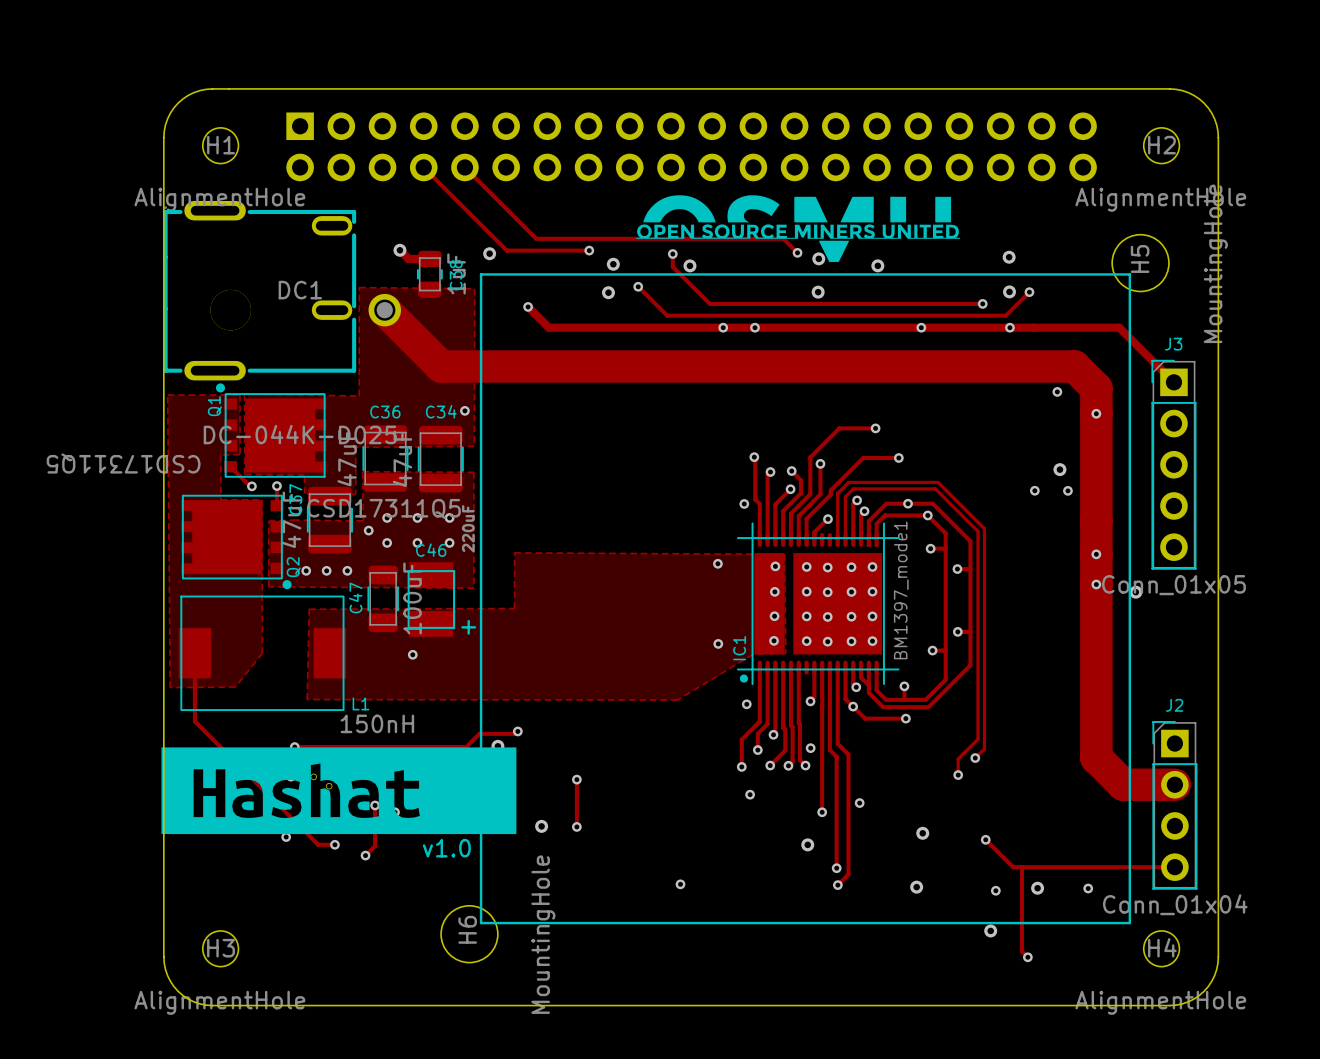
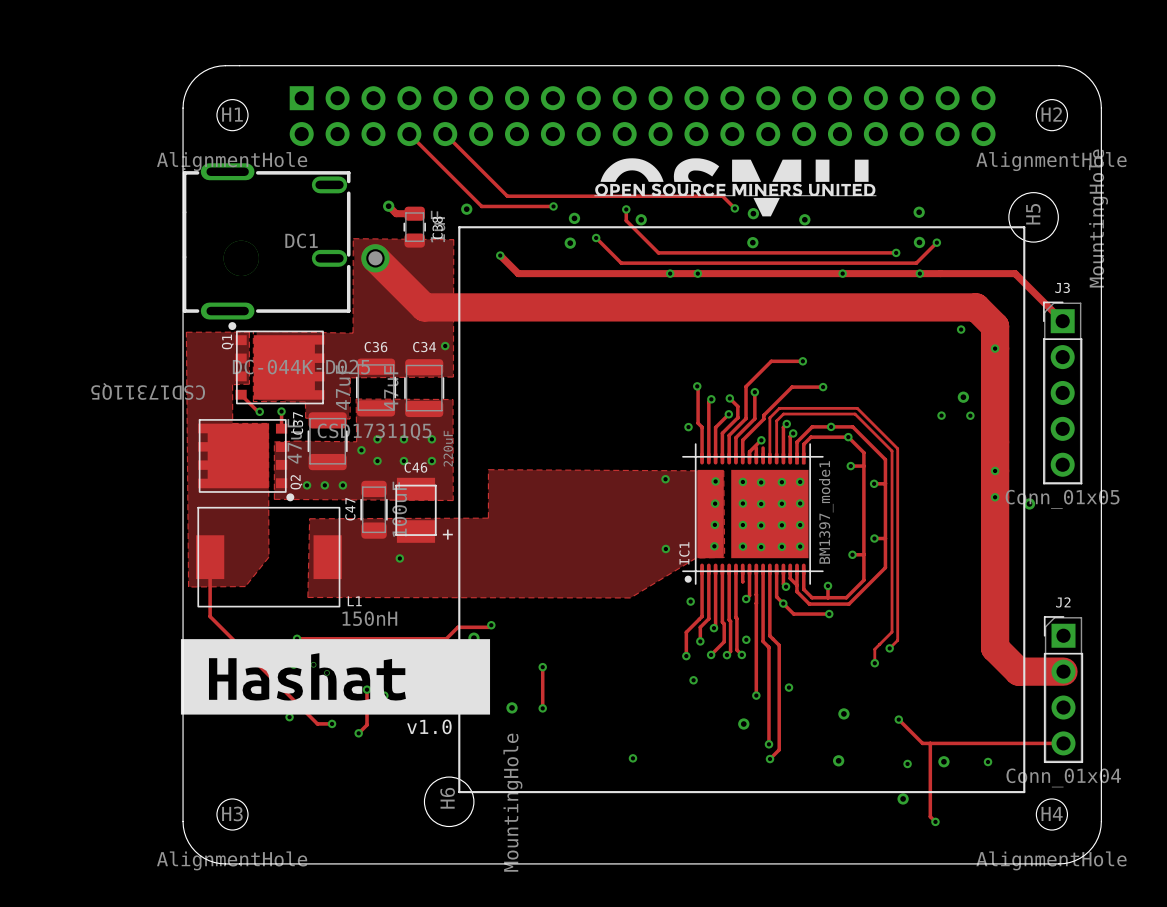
track: none -> (756, 447) (756, 458)
track: none -> (763, 448) (763, 458)
track: none -> (742, 569) (742, 581)

